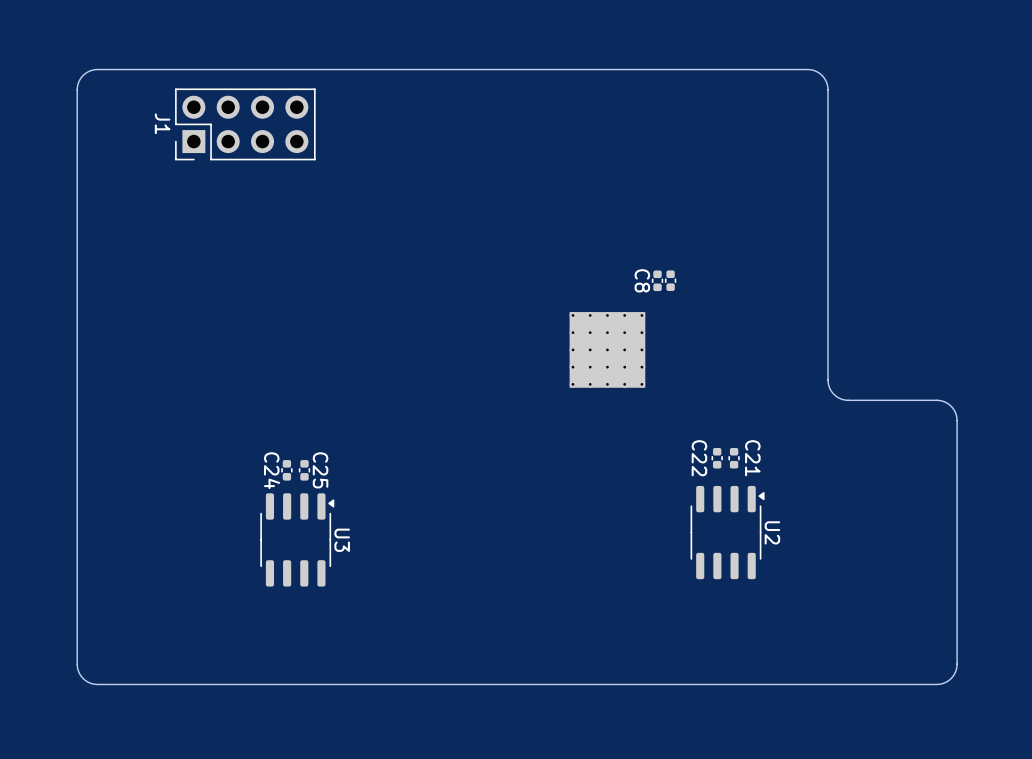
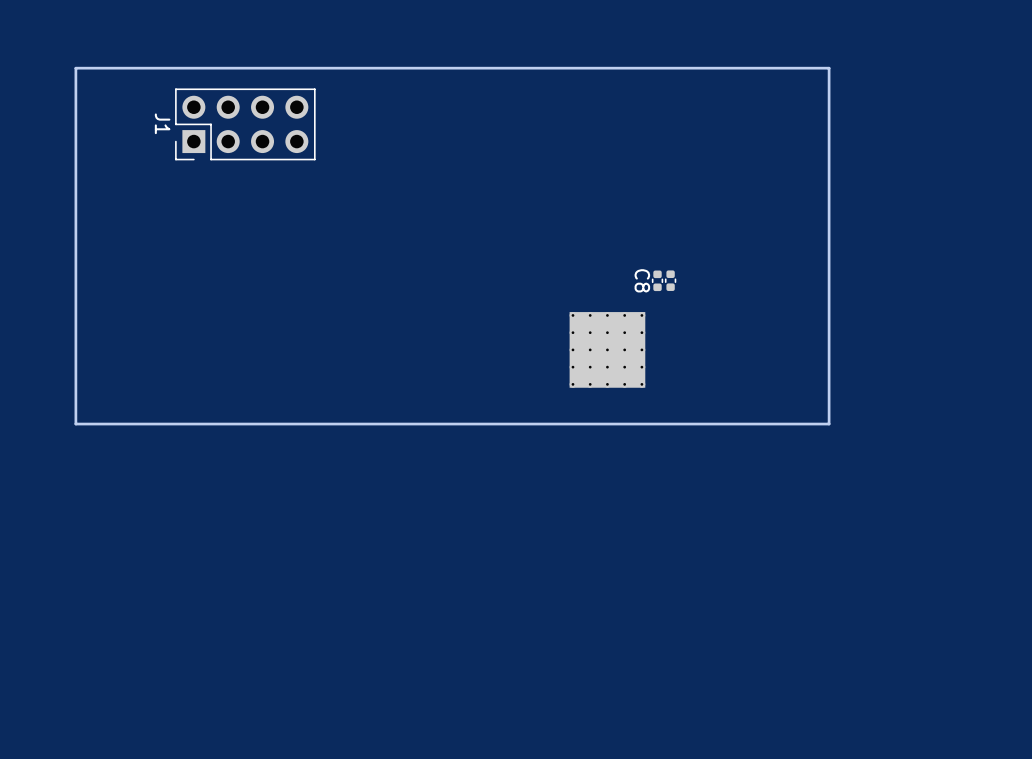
board edge: none -> (829, 68) (75, 68) (75, 424) (829, 424) (829, 68)
board edge: (807, 69) (97, 69) (85, 73) (79, 79) (77, 89) (77, 664) (81, 676) (87, 681) (97, 684) (936, 684) (949, 680) (954, 674) (957, 664) (956, 415) (951, 406) (942, 401) (845, 400) (835, 396) (829, 387) (827, 87) (822, 75) (815, 71) (807, 69) -> none
C22: (717, 458) -> none
C21: (734, 458) -> none
C24: (286, 470) -> none
C25: (304, 470) -> none
U2: (727, 532) -> none
U3: (297, 539) -> none

